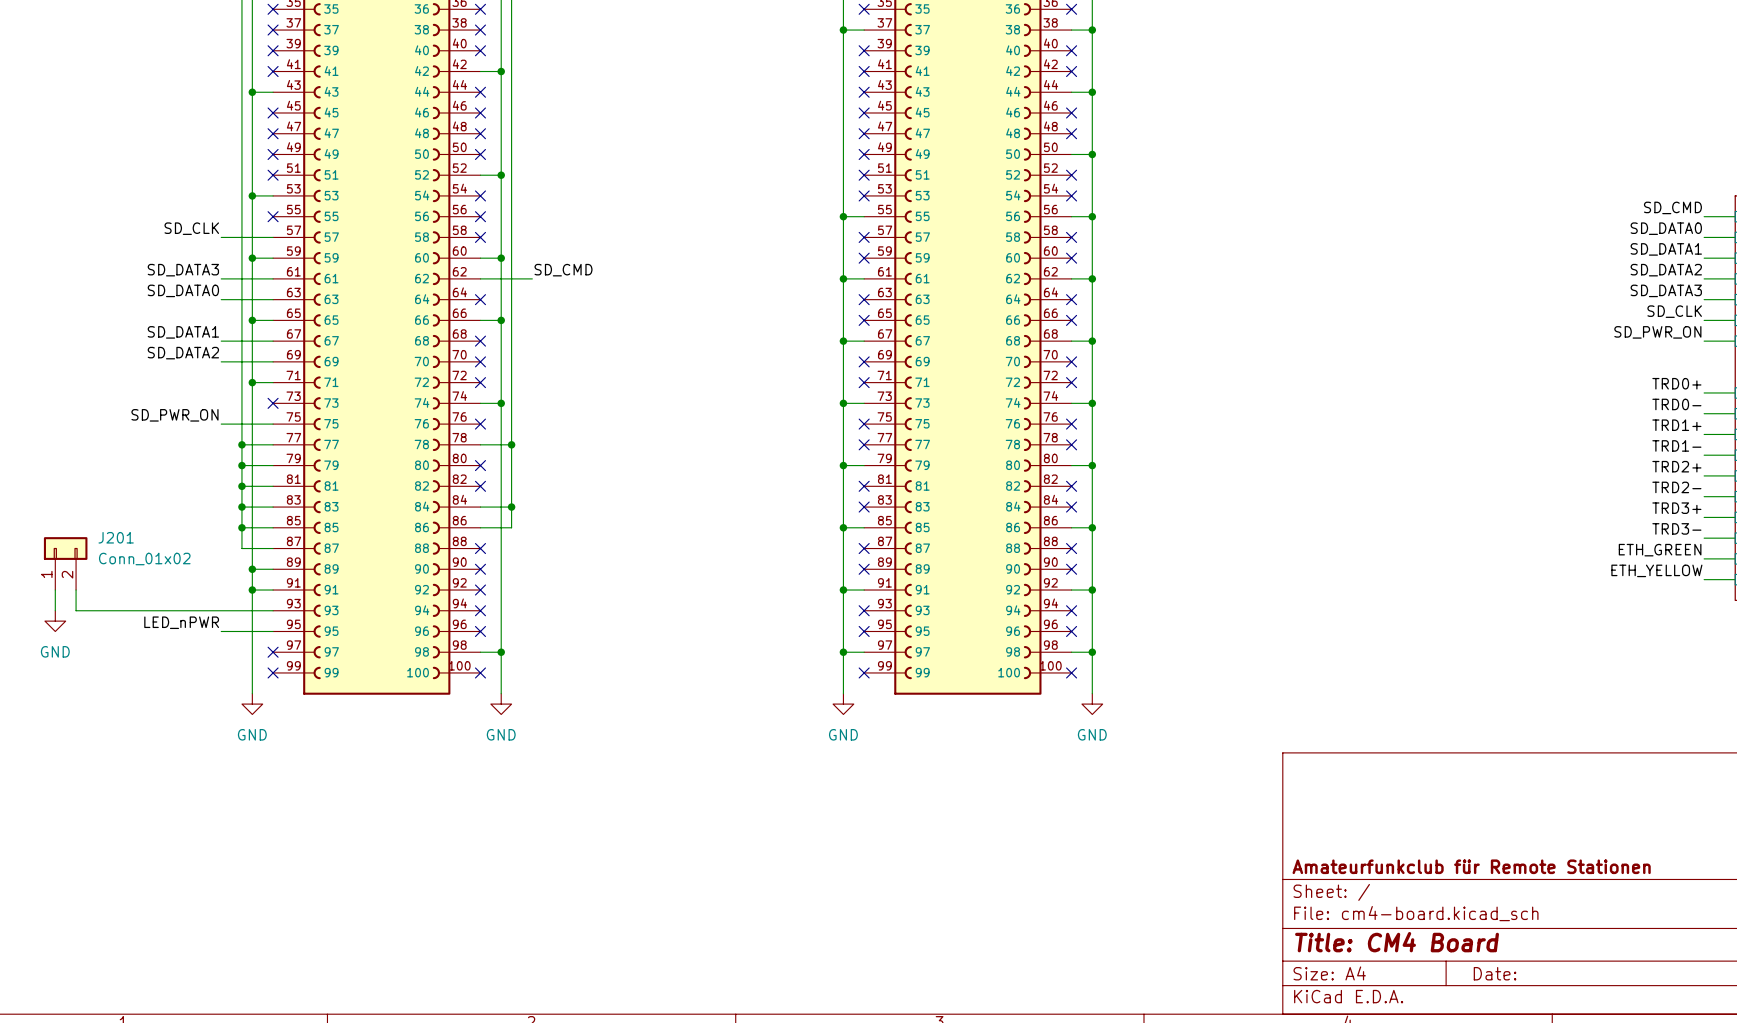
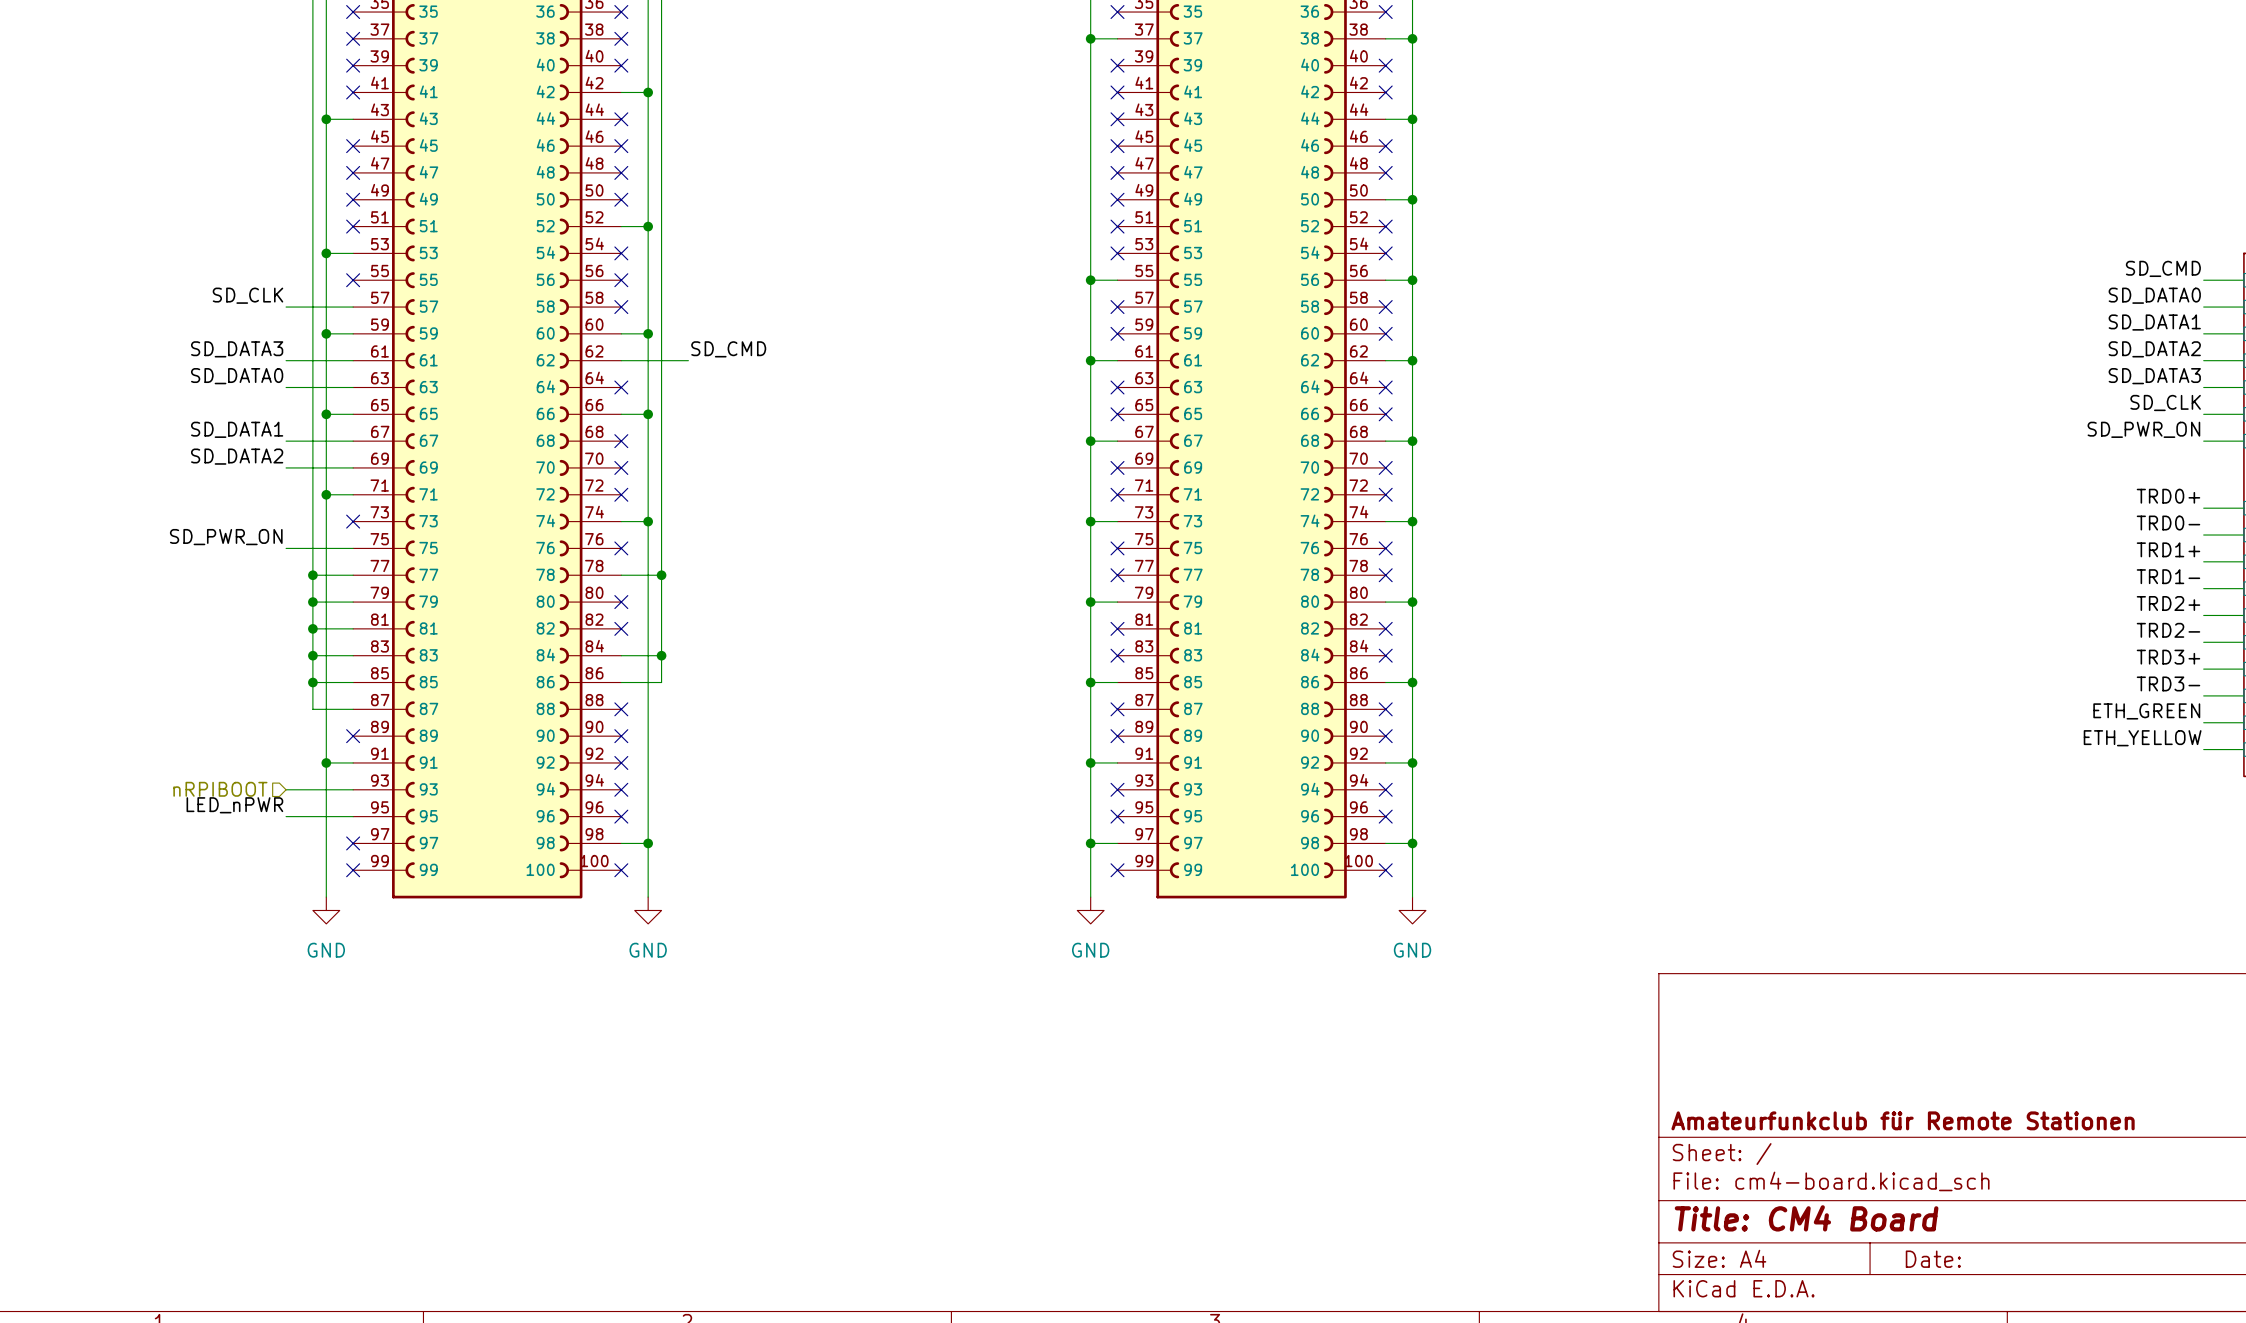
J201: Conn_01x02 (65, 563) -> none
wire: (252, 569) (273, 569) -> none
junction: (252, 569) -> none
no-connect mark: none -> (353, 736)
wire: (55, 590) (55, 610) -> none
wire: (76, 590) (76, 610) (221, 610) -> none
hierarchical label: none -> nRPIBOOT (220, 789)
power symbol: GND (55, 621) -> none

